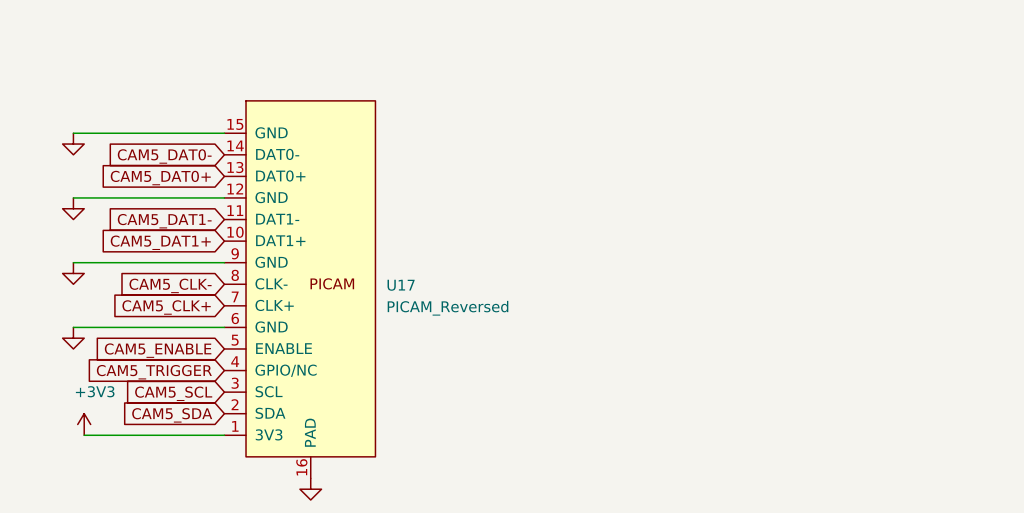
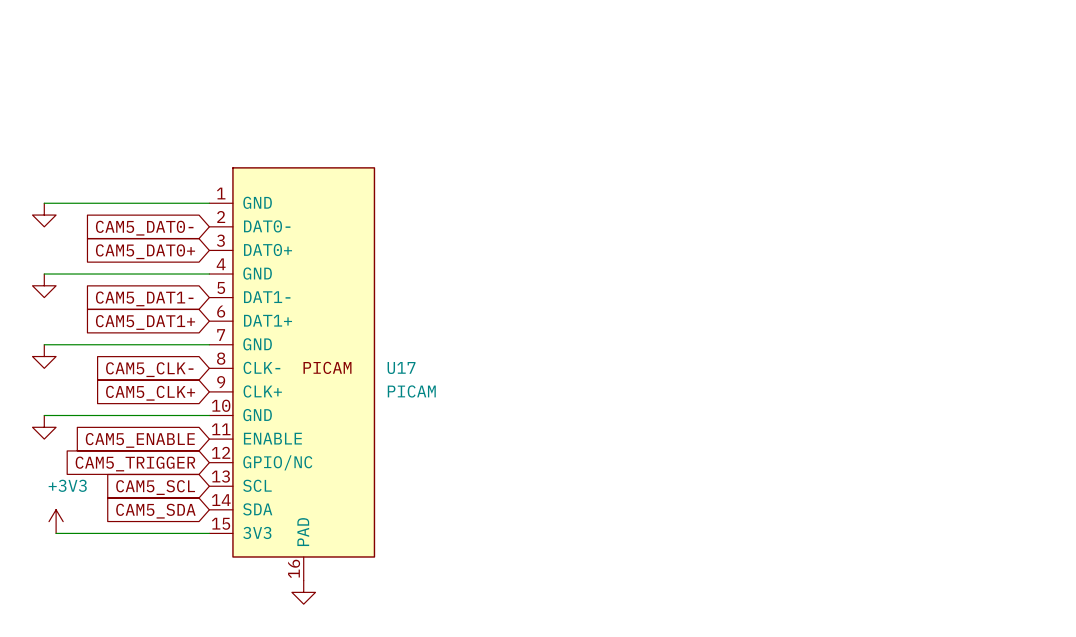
U17 symbol: [224, 100, 377, 479] -> [209, 167, 376, 581]
U17 value: PICAM_Reversed (448, 308) -> PICAM (411, 391)

